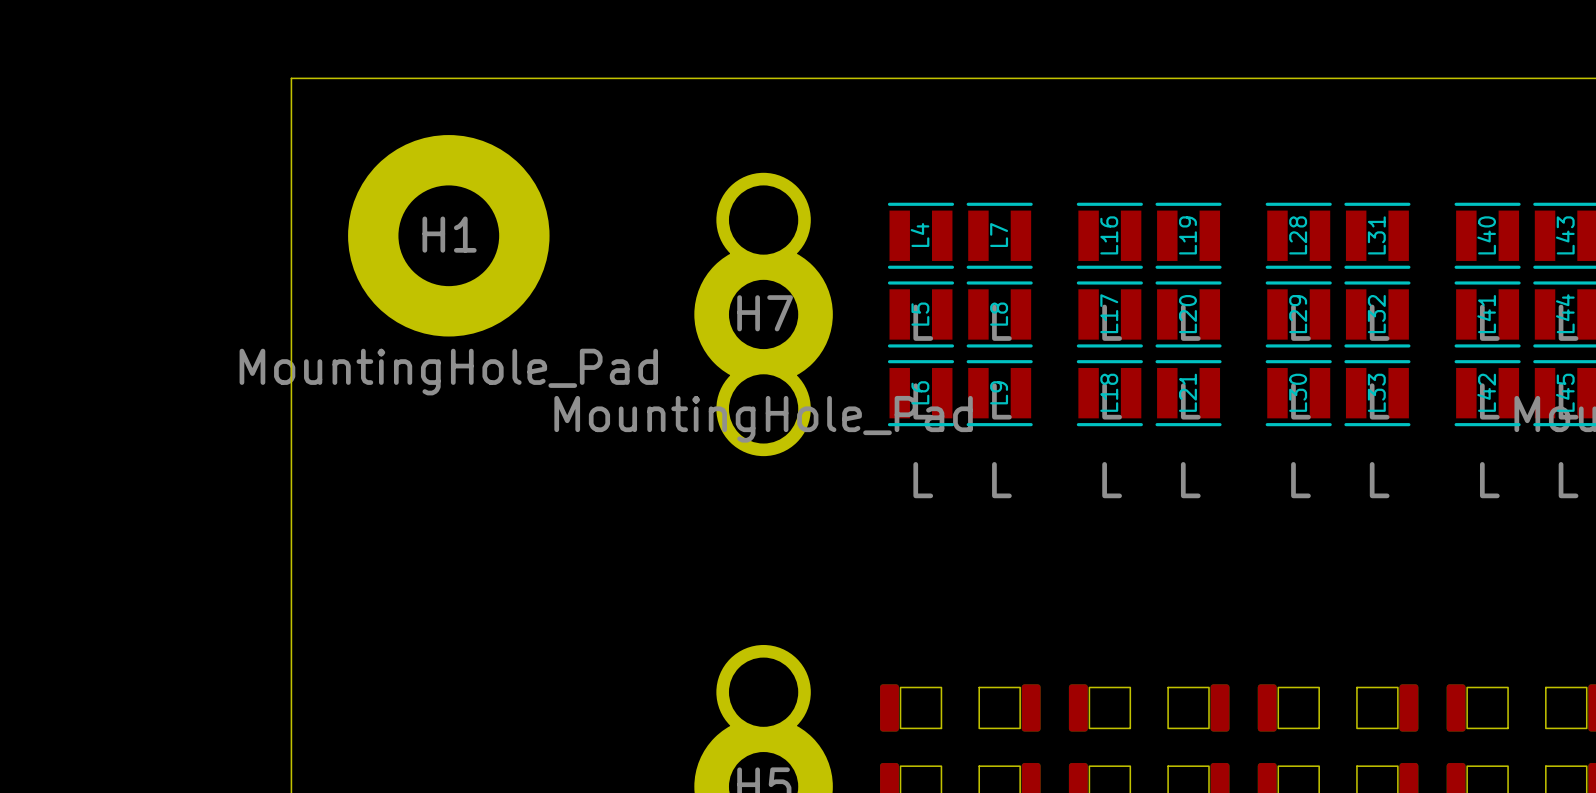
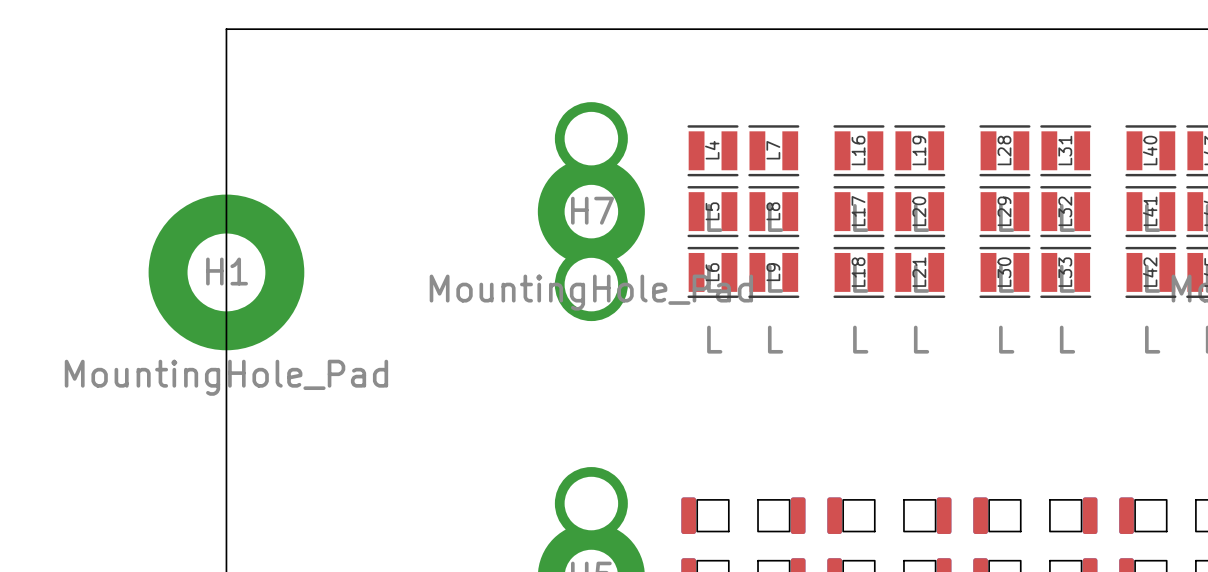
H1 position: (448, 235) -> (226, 272)

